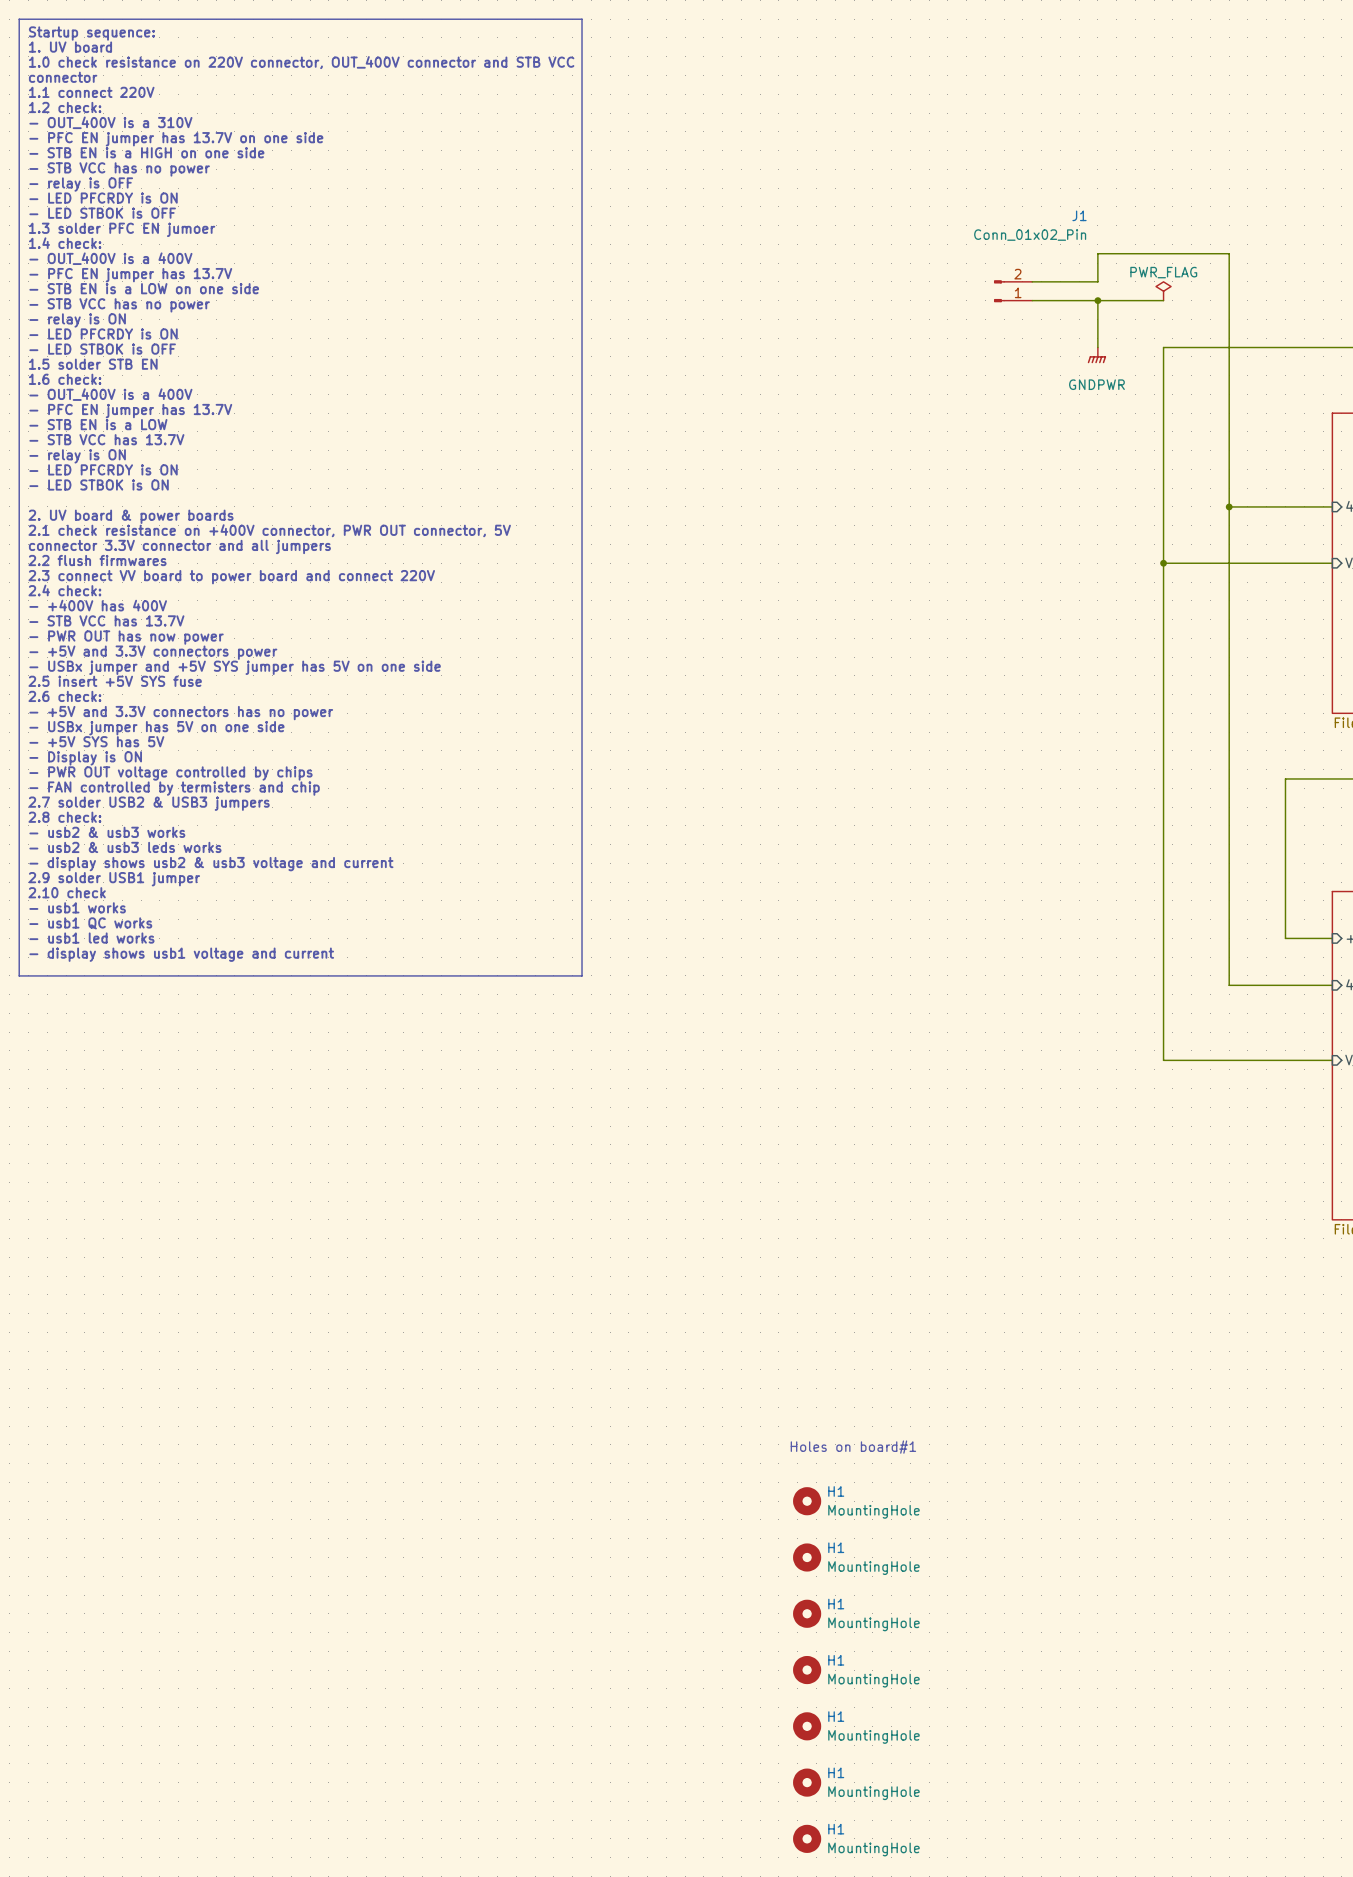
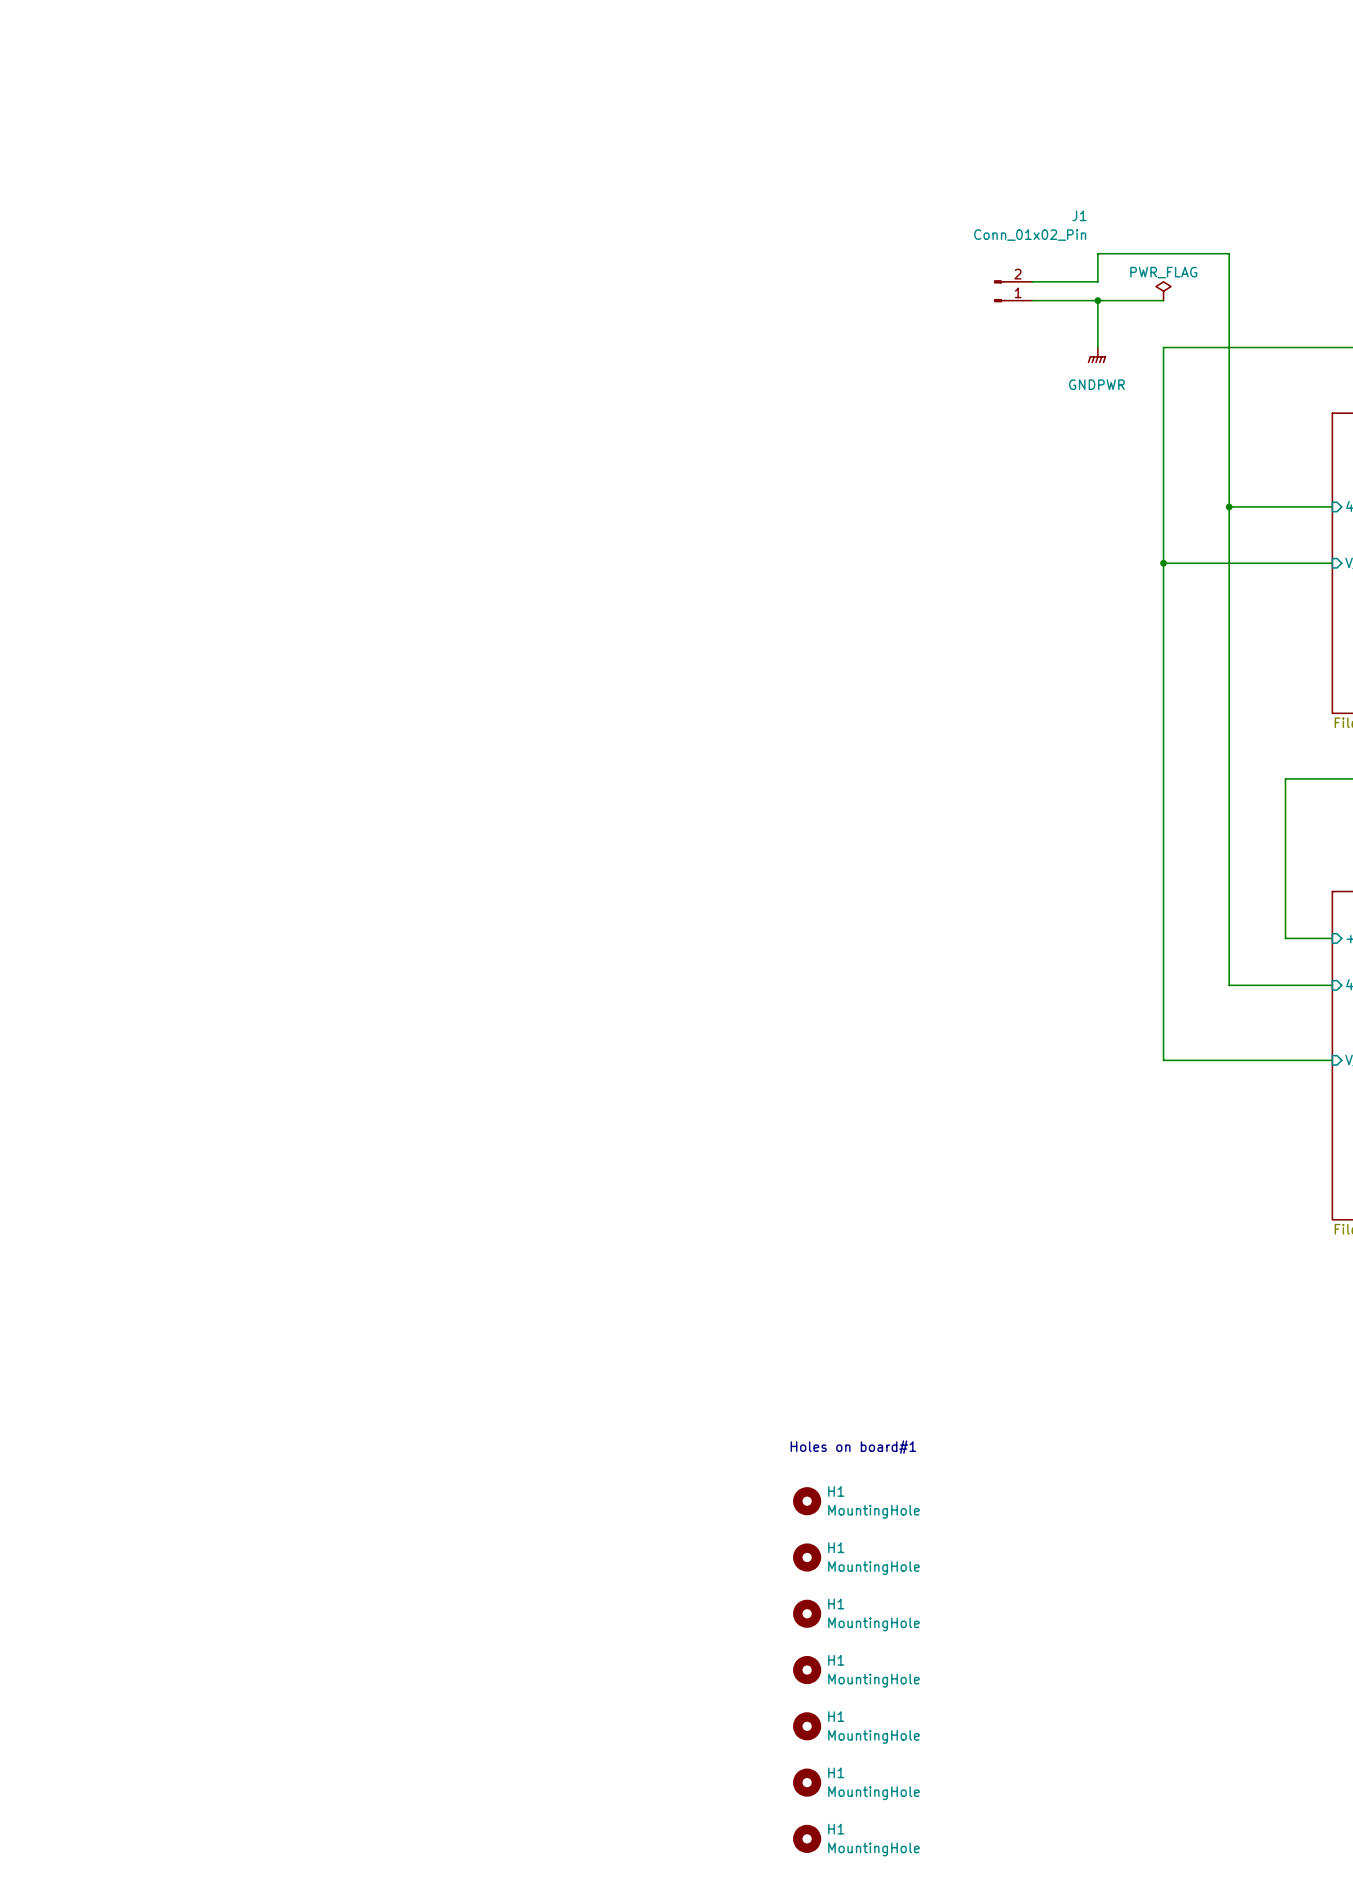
line: (19, 19) (582, 19) (582, 975) (19, 975) (19, 19) -> none
text: Startup sequence: (91, 33) -> none
text: 1. UV board (70, 47) -> none
text: 1.0 check resistance on 220V connector, OUT_400V connector and STB VCC (301, 62) -> none
text: connector (63, 77) -> none
text: 1.1 connect 220V (91, 92) -> none
text: 1.2 check: (65, 107) -> none
text: - OUT_400V is a 310V (110, 122) -> none
text: - PFC EN jumper has 13.7V on one side (176, 139) -> none
text: - STB EN is a HIGH on one side (146, 152) -> none
text: - STB VCC has no power (119, 169) -> none
text: - relay is OFF (81, 184) -> none
text: - LED PFCRDY is ON (103, 198) -> none
text: - LED STBOK is OFF (102, 213) -> none
text: 1.3 solder PFC EN jumoer (122, 229) -> none
text: 1.4 check: (65, 243) -> none
text: - OUT_400V is a 400V (110, 258) -> none
text: - PFC EN jumper has 13.7V (130, 275) -> none
text: - STB EN is a LOW on one side (144, 288) -> none
text: - STB VCC has no power (119, 305) -> none
text: - relay is ON (77, 320) -> none
text: - LED PFCRDY is ON (103, 333) -> none
text: - LED STBOK is OFF (102, 349) -> none
text: 1.5 solder STB EN (93, 364) -> none
text: 1.6 check: (65, 379) -> none
text: - OUT_400V is a 400V (110, 394) -> none
text: - PFC EN jumper has 13.7V (130, 411) -> none
text: - STB EN is a LOW (98, 424) -> none
text: - STB VCC has 13.7V (106, 439) -> none
text: - relay is ON (77, 456) -> none
text: - LED PFCRDY is ON (103, 469) -> none
text: - LED STBOK is ON (99, 485) -> none
text: 2. UV board & power boards (131, 516) -> none
text: 2.1 check resistance on +400V connector, PWR OUT connector, 5V (269, 530) -> none
text: connector 3.3V connector and all jumpers (179, 546) -> none
text: 2.2 flush firmwares (97, 560) -> none
text: 2.3 connect VV board to power board and connect 220V (231, 577) -> none
text: 2.4 check: (64, 590) -> none
text: - +400V has 400V (98, 605) -> none
text: - STB VCC has 13.7V (106, 620) -> none
text: - PWR OUT has now power (126, 637) -> none
text: - +5V and 3.3V connectors power (153, 652) -> none
text: - USBx jumper and +5V SYS jumper has 5V on one side (235, 667) -> none
text: 2.5 insert +5V SYS fuse (115, 681) -> none
text: 2.6 check: (64, 696) -> none
text: - +5V and 3.3V connectors has no power (181, 713) -> none
text: - USBx jumper has 5V on one side (156, 728) -> none
text: - +5V SYS has 5V (96, 741) -> none
text: - Display is ON (85, 758) -> none
text: - PWR OUT voltage controlled by chips (170, 773) -> none
text: - FAN controlled by termisters and chip (174, 788) -> none
text: 2.7 solder USB2 & USB3 jumpers (149, 803) -> none
text: 2.8 check: (64, 817) -> none
text: - usb2 & usb3 works (107, 832) -> none
text: - usb2 & usb3 leds works (125, 847) -> none
text: - display shows usb2 & usb3 voltage and current (211, 864) -> none
text: 2.9 solder USB1 jumper (114, 879) -> none
text: 2.10 check (67, 892) -> none
text: - usb1 works (77, 907) -> none
text: - usb1 QC works (90, 923) -> none
text: - usb1 led works (91, 938) -> none
text: - display shows usb1 voltage and current (181, 954) -> none

